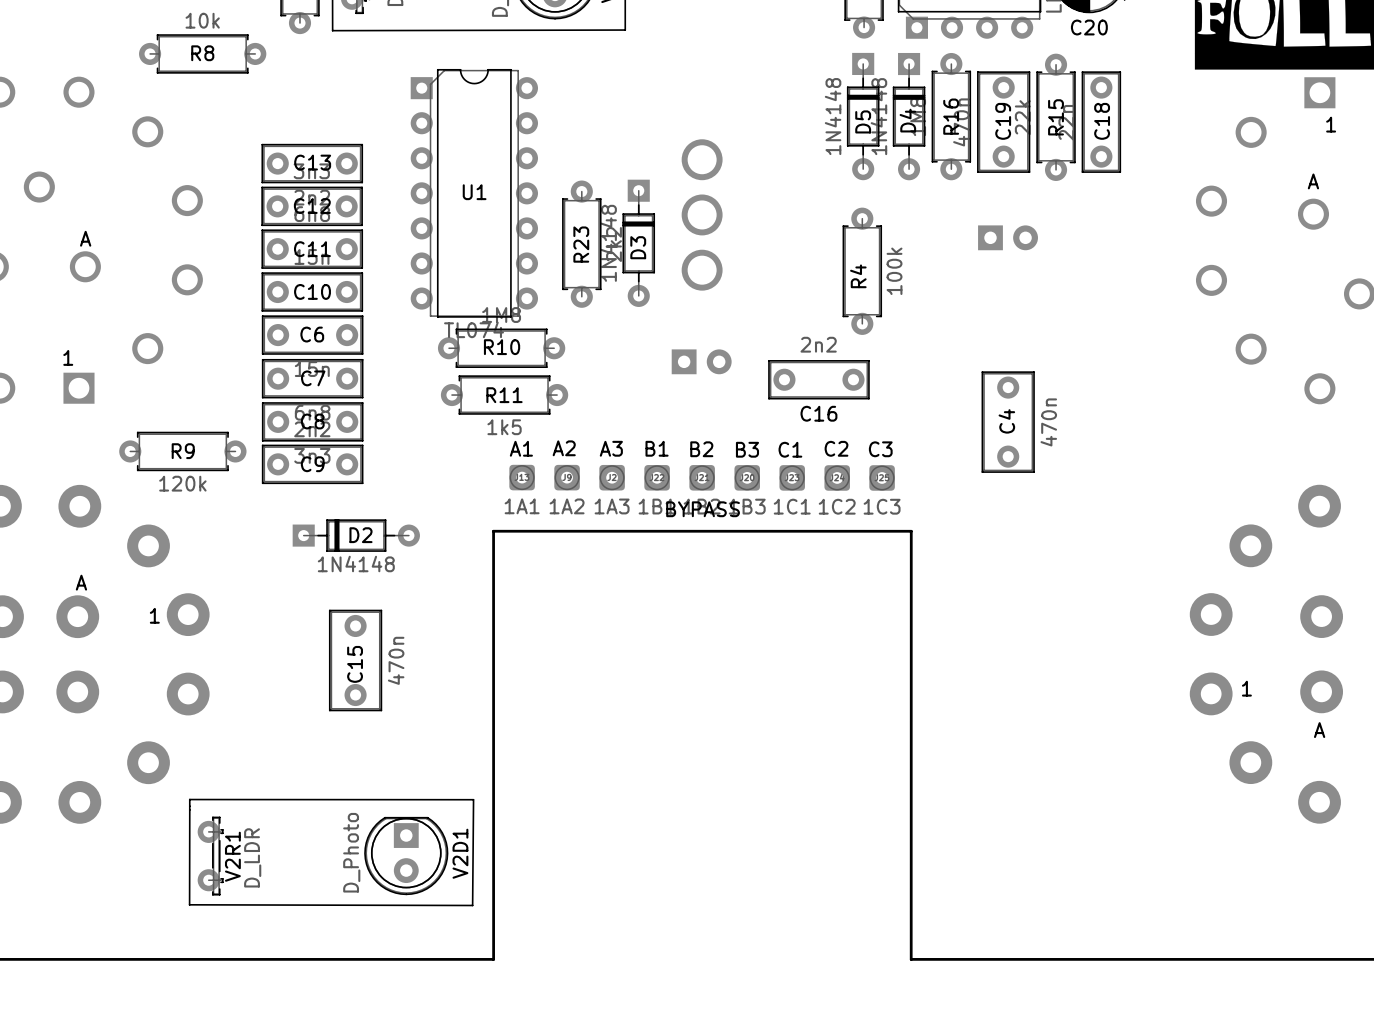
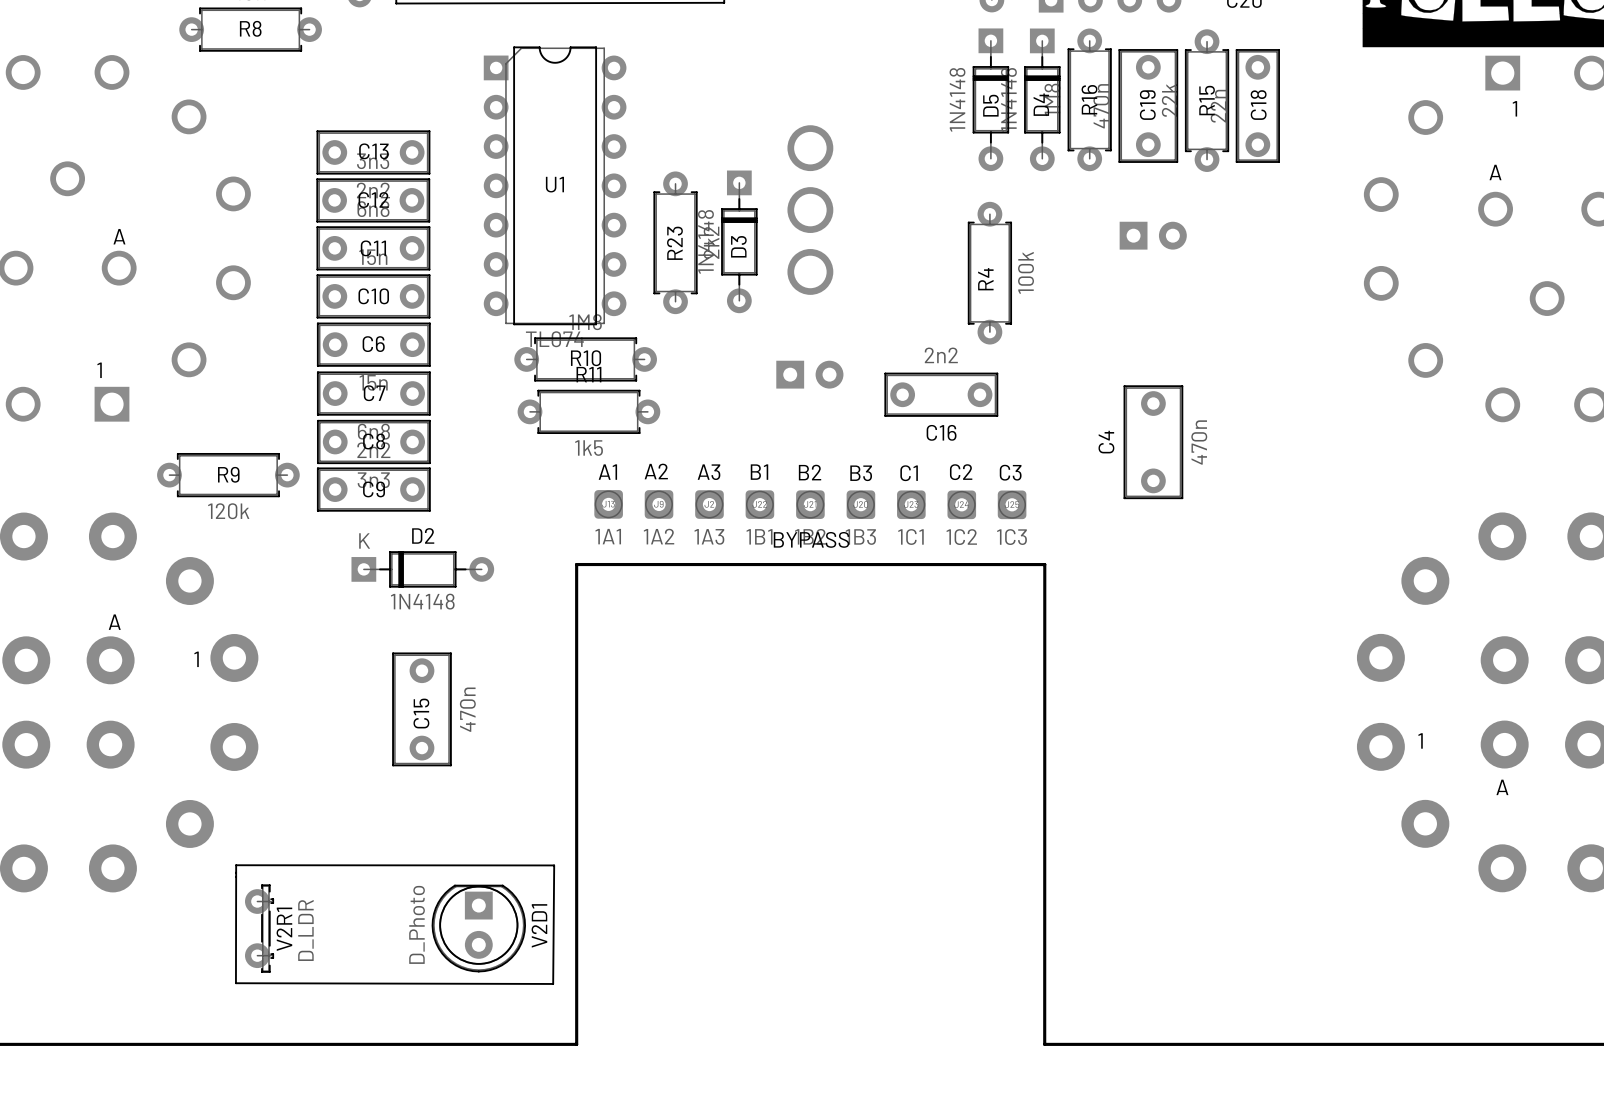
R11 name position: R11 (504, 395) -> R11 (588, 374)
C4 name position: C4 (1006, 421) -> C4 (1106, 442)
D2 text: none -> K (364, 540)
D2 name position: D2 (360, 535) -> D2 (423, 535)

